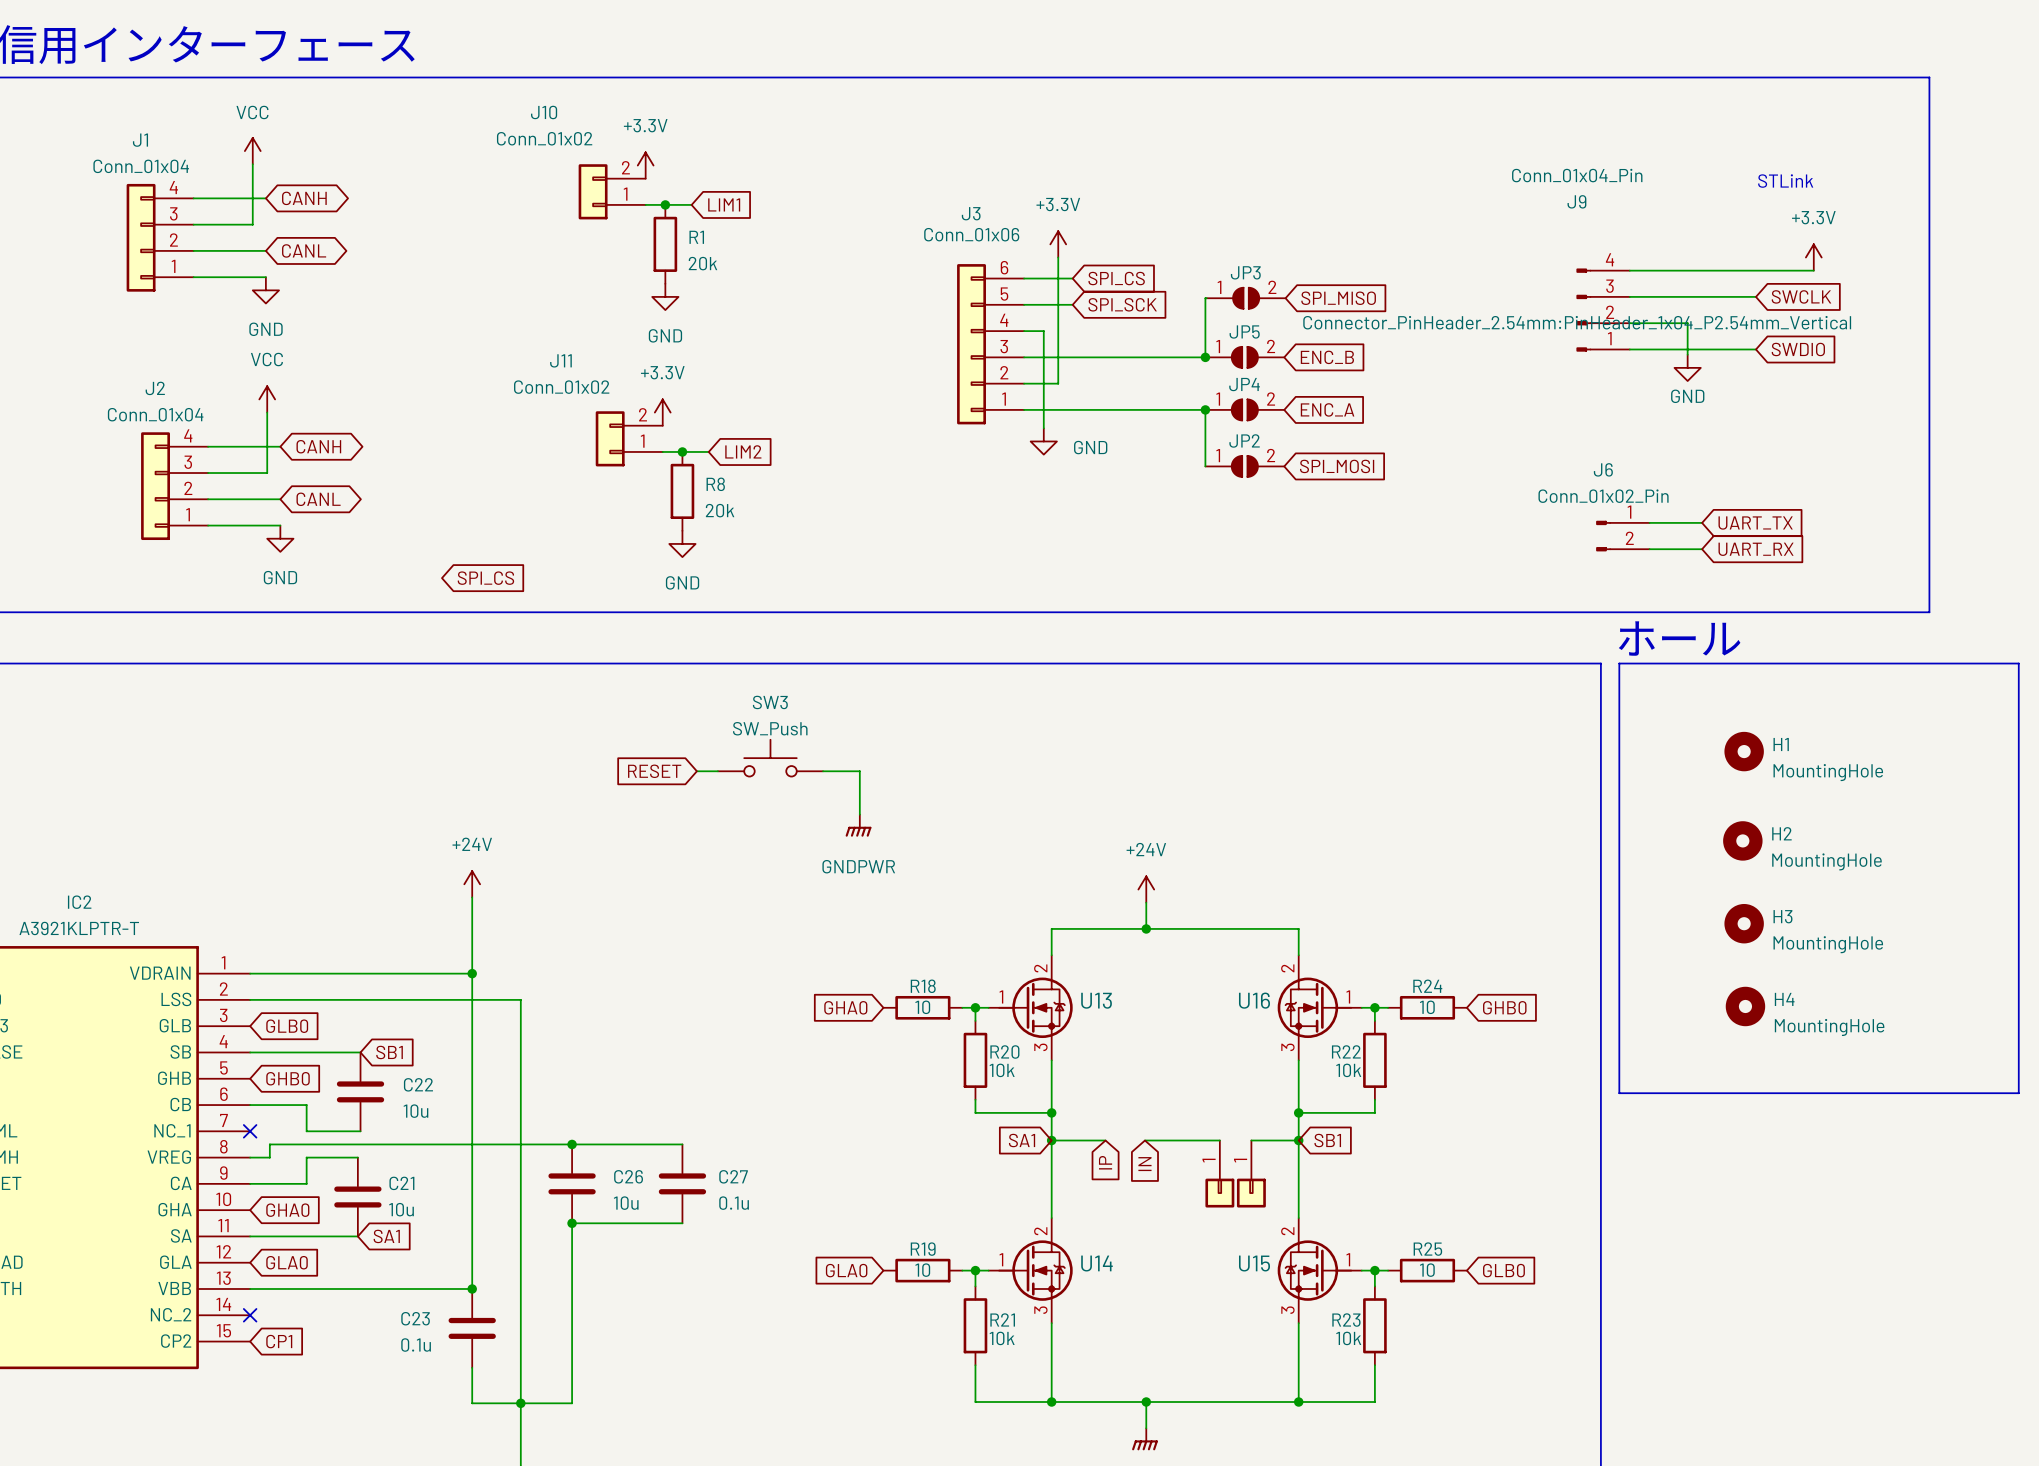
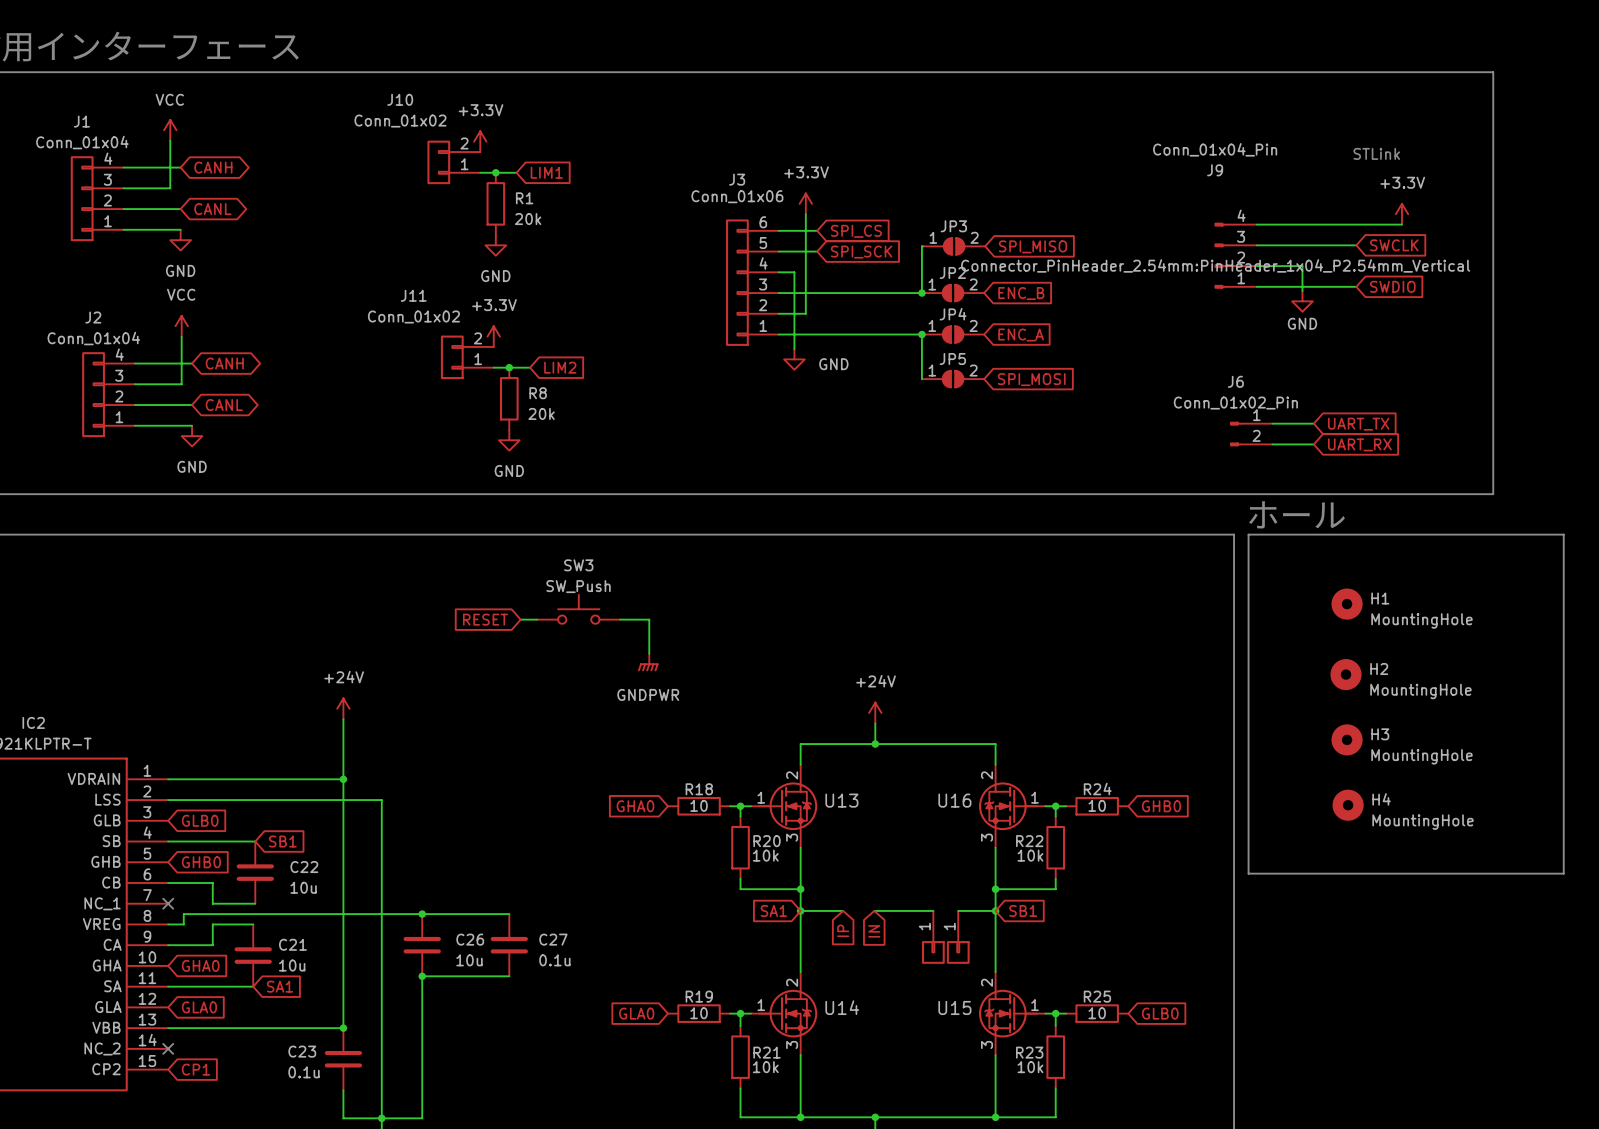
JP5 name: JP5 (1244, 331) -> JP2 (952, 272)
JP2 name: JP2 (1244, 440) -> JP5 (952, 359)
global label: SPI_CS (485, 578) -> none

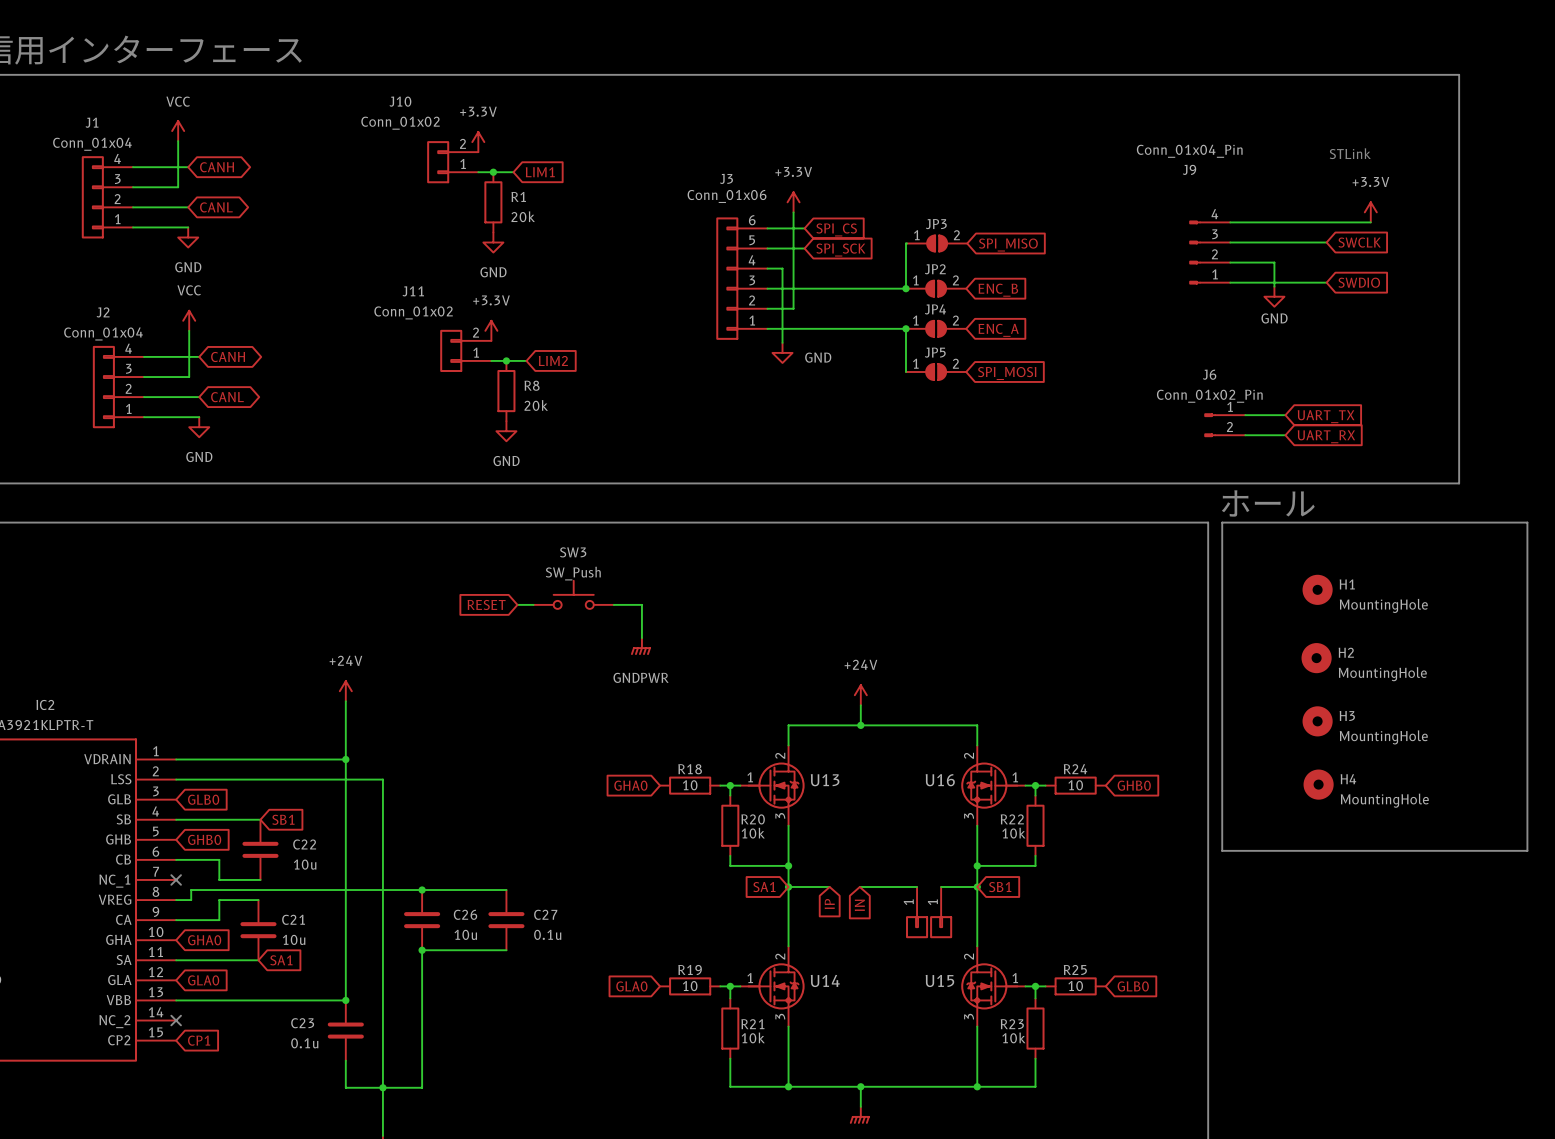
J9 text: Connector_PinHeader_2.54mm:PinHeader_1x04_P2.54mm_Vertical (1215, 265) -> none

